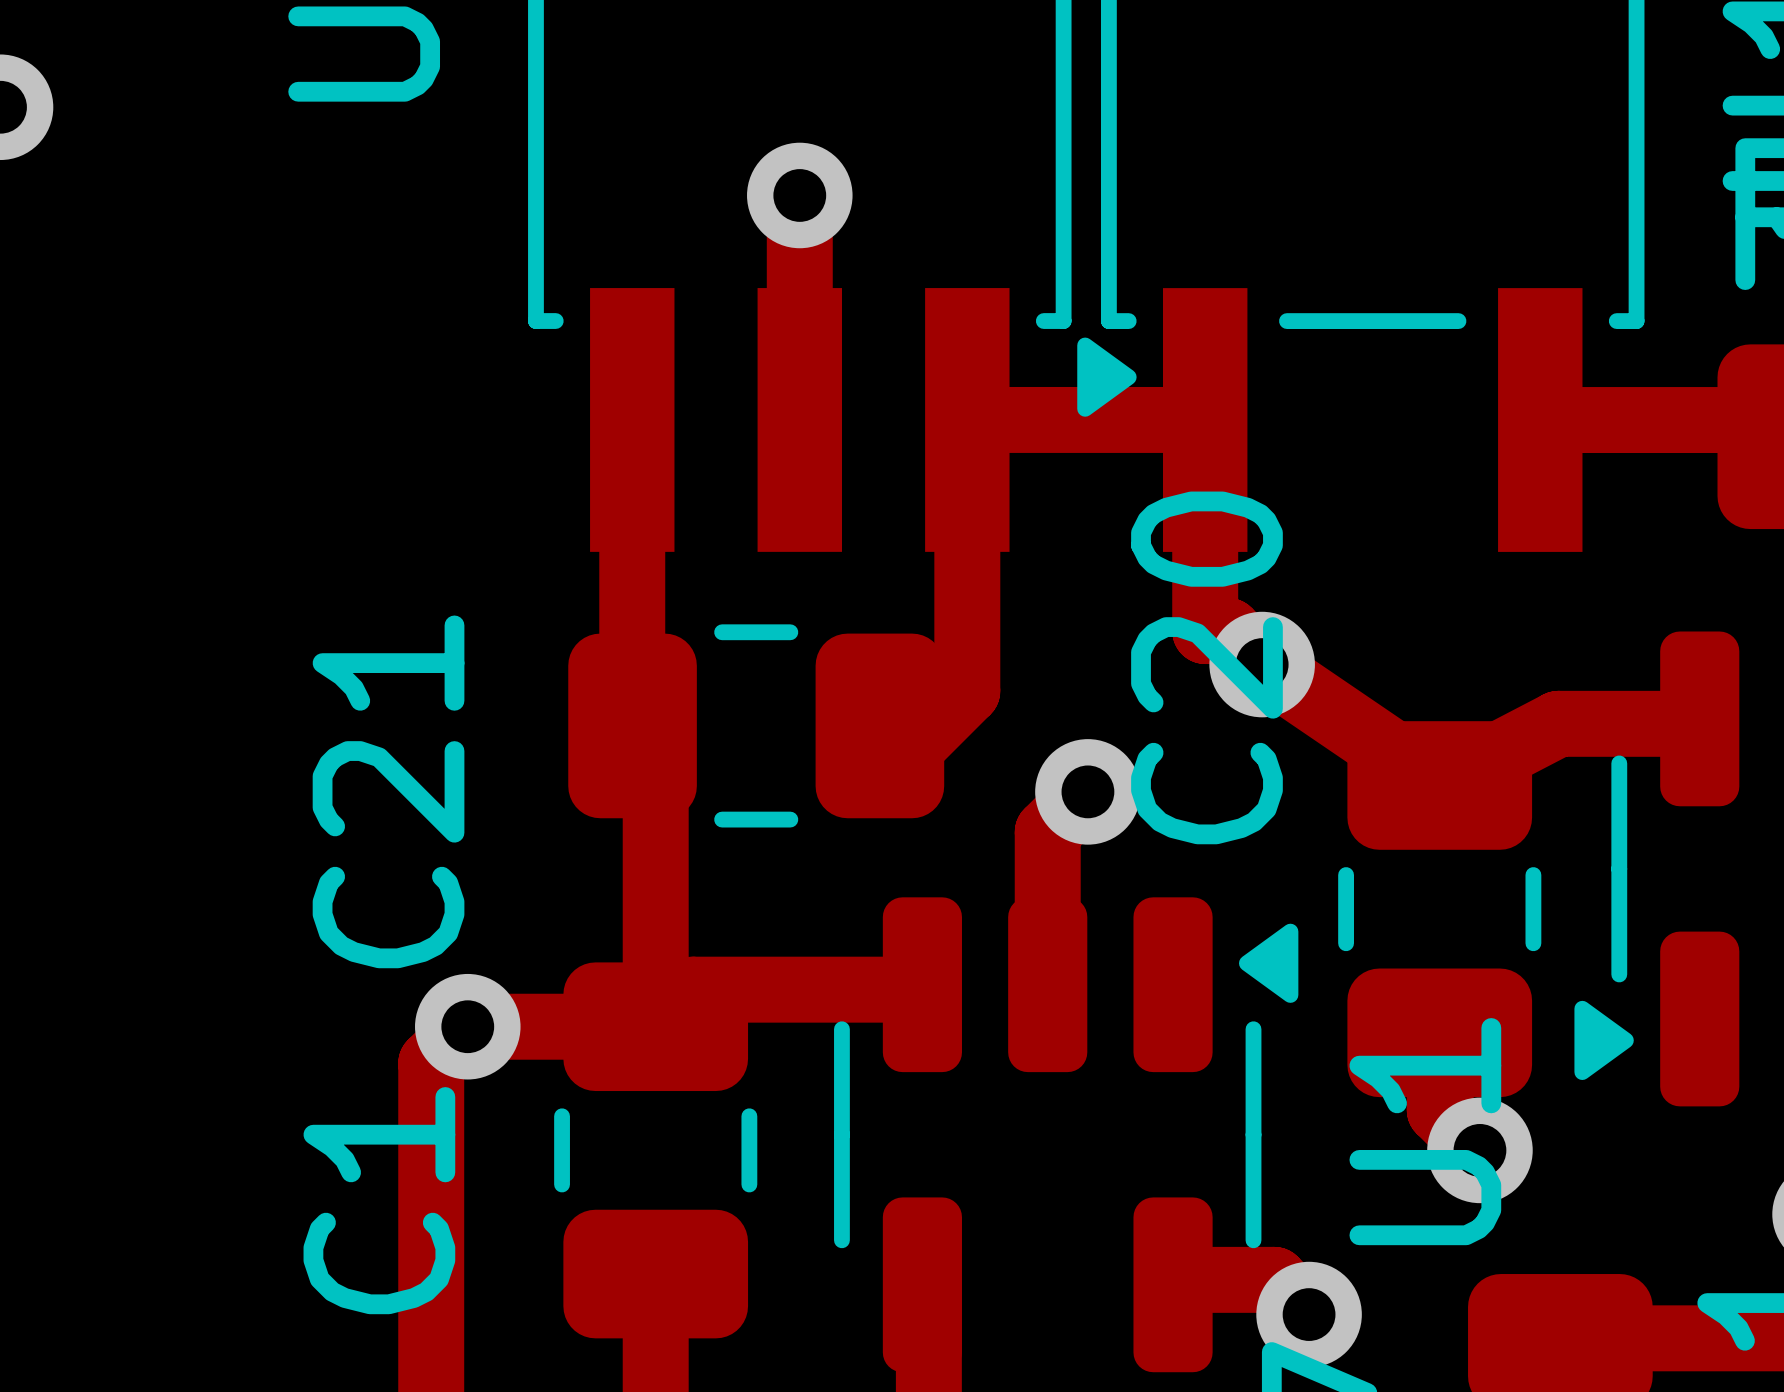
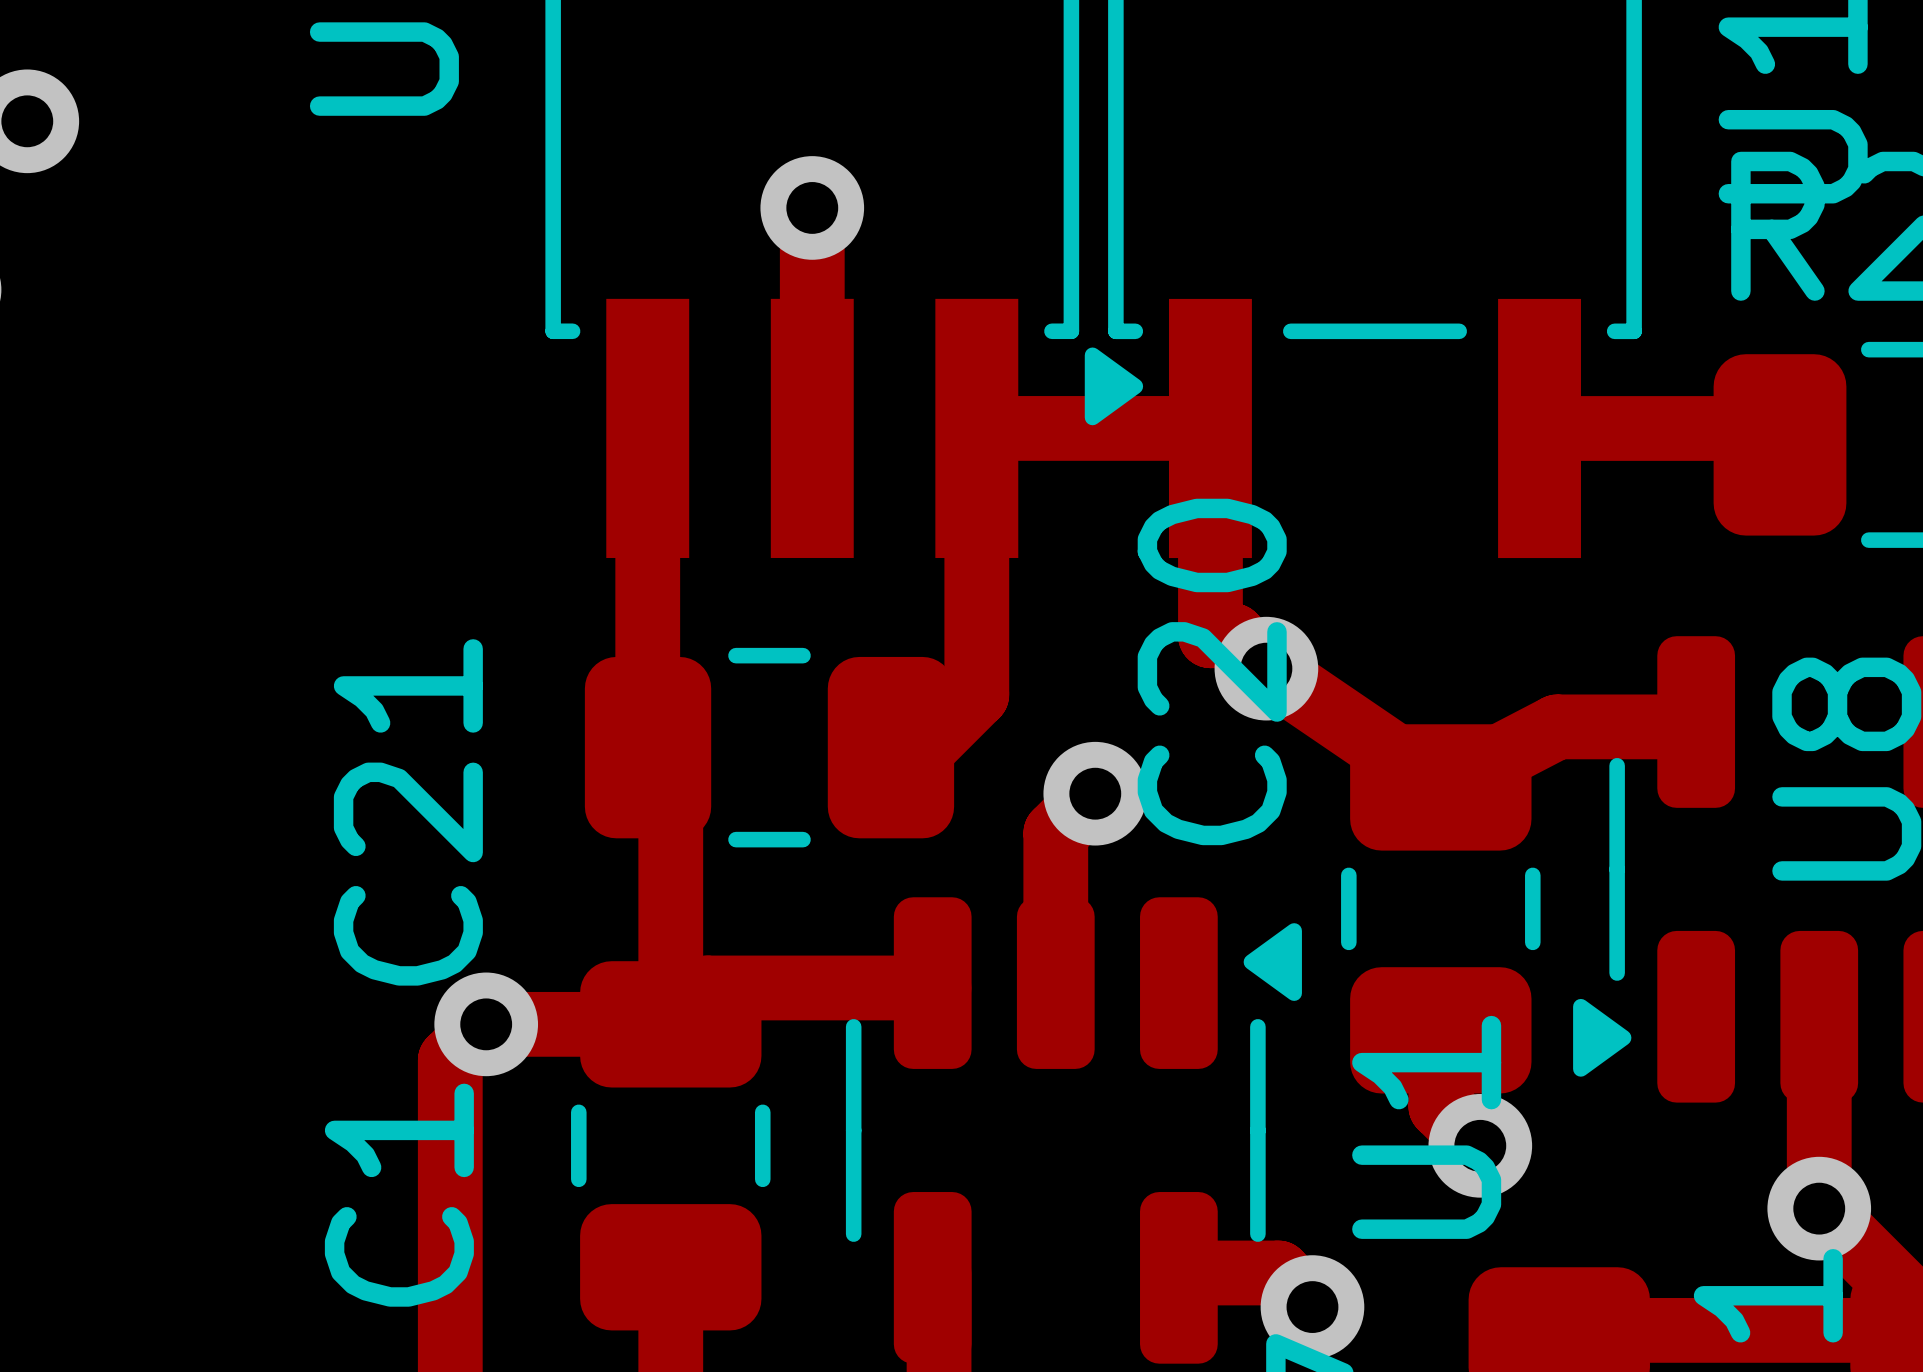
C21 position: (756, 725) -> (769, 747)

